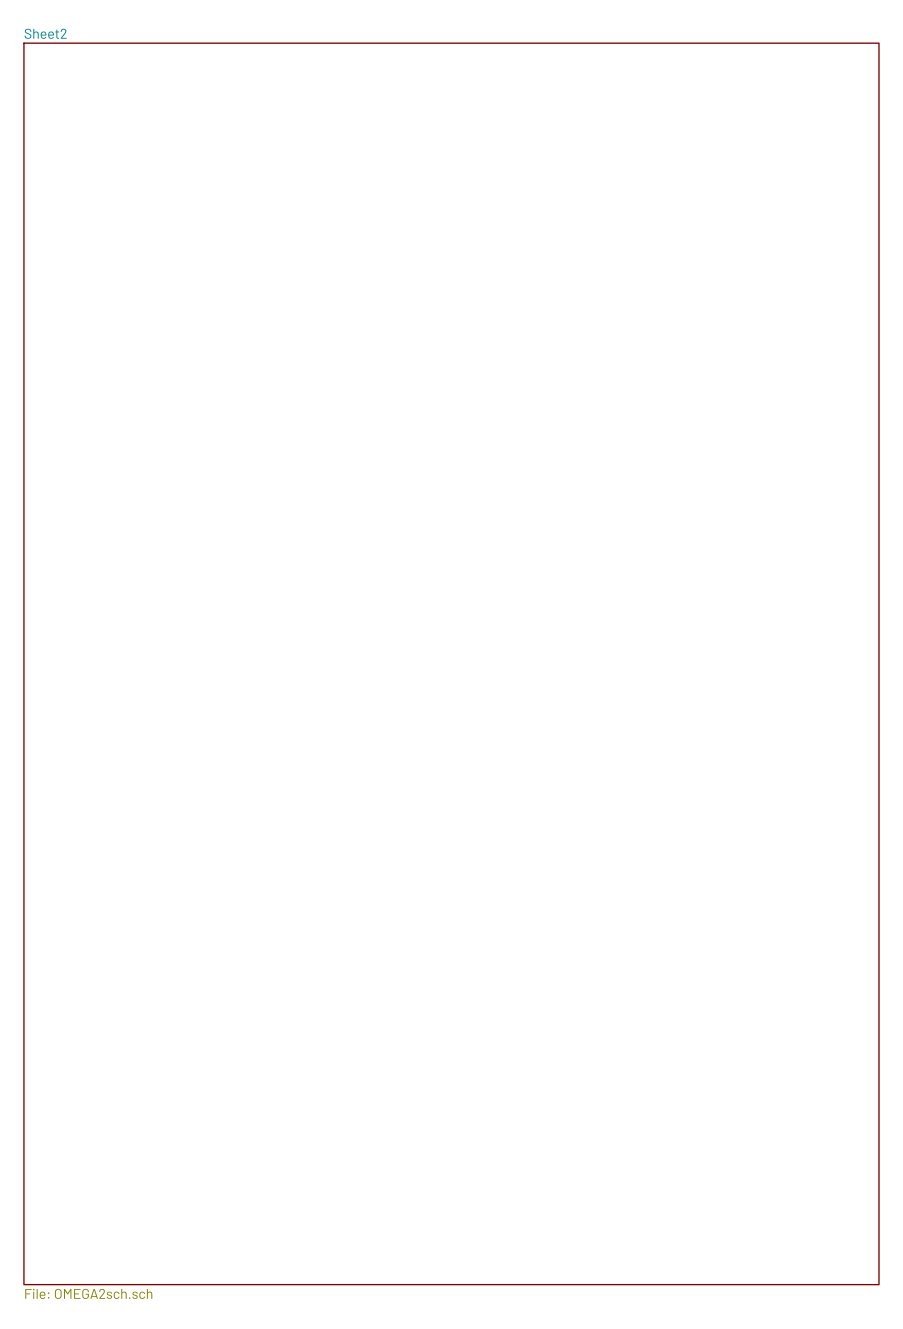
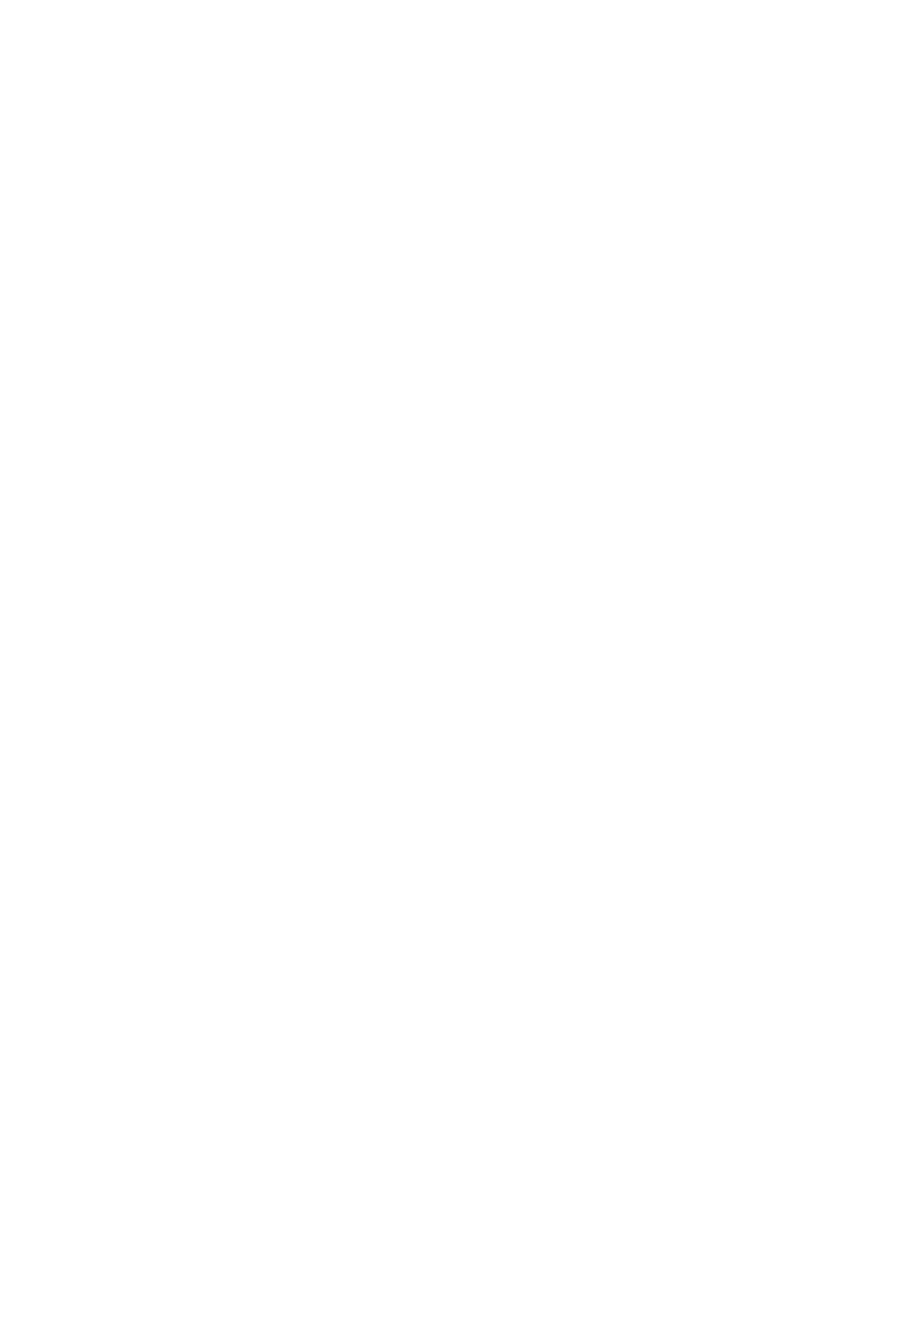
sheet Sheet2: File: OMEGA2sch.sch (451, 663) -> none

